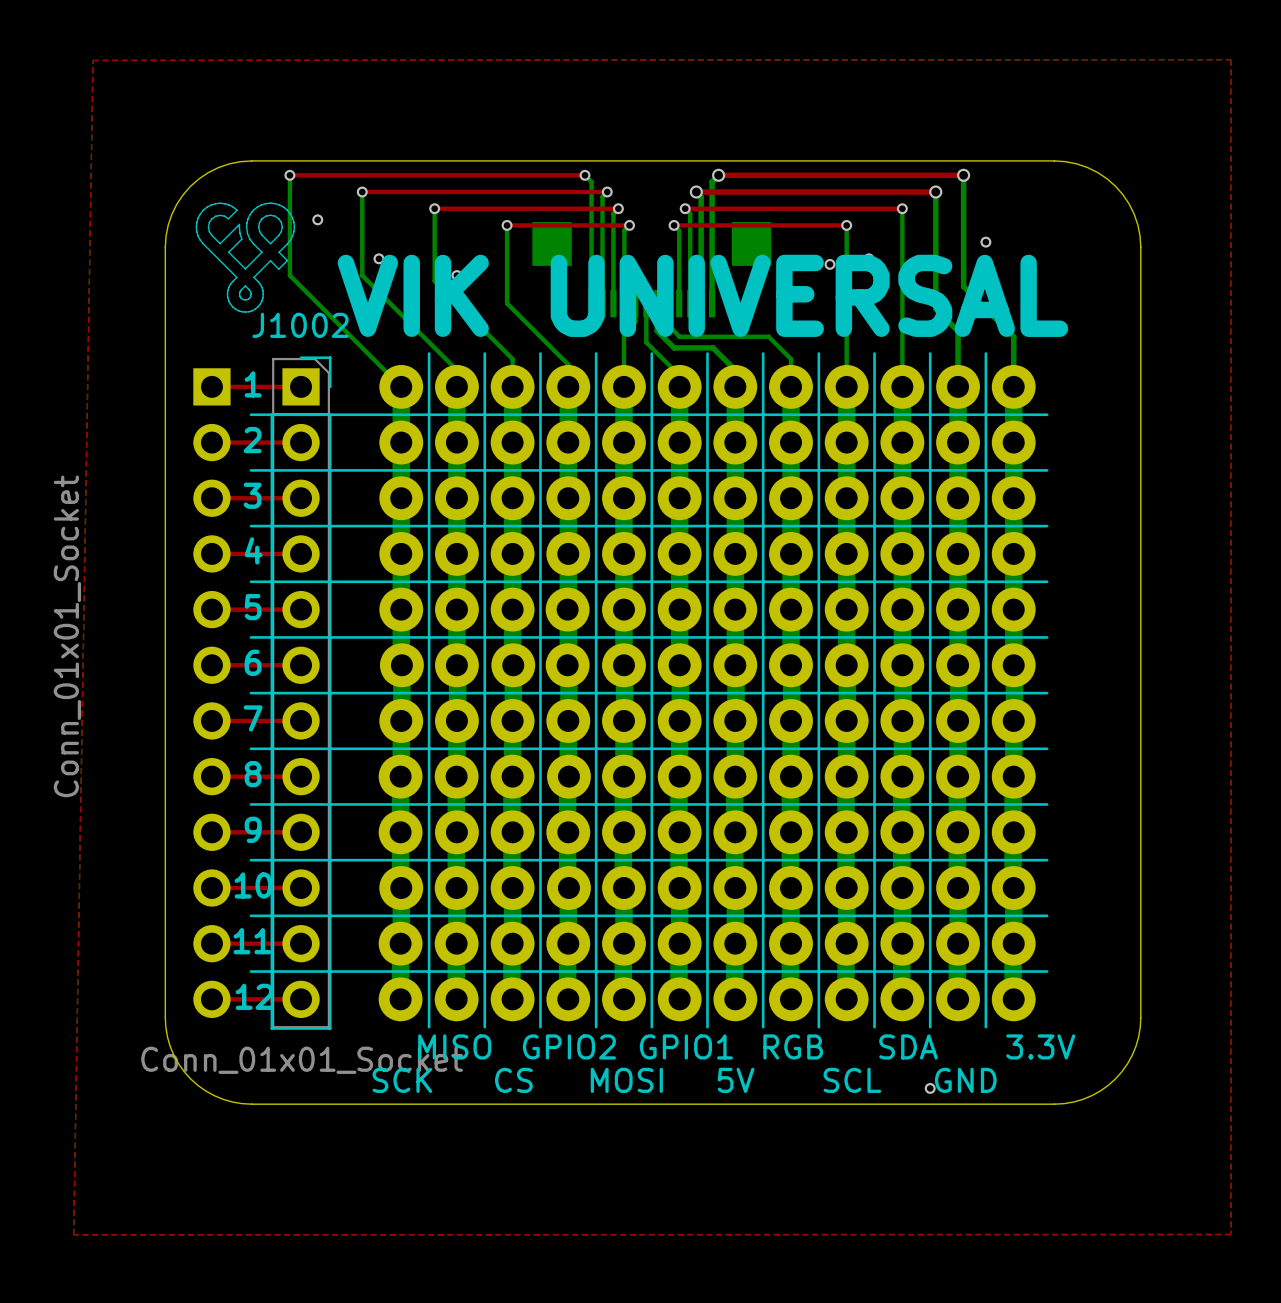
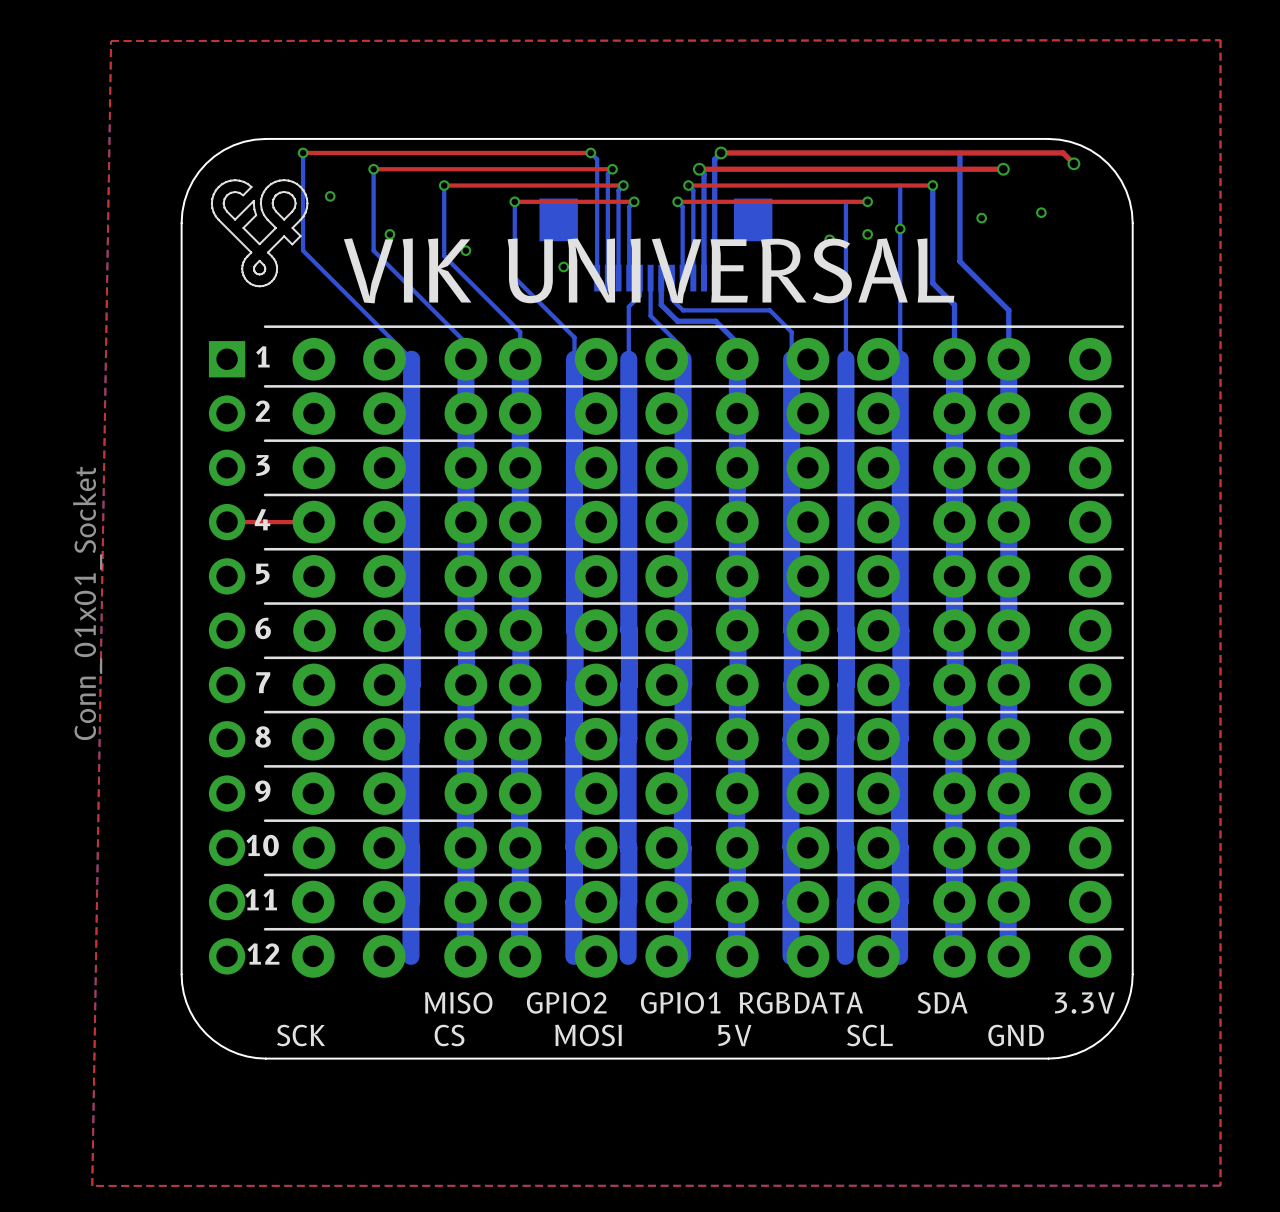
top track: none -> (959, 152) (1063, 152) (1073, 163)
via: (963, 175) -> none
via: none -> (1073, 163)
top track: none -> (932, 169) (1003, 169)
bottom track: (935, 192) (935, 208) -> none
via: (935, 192) -> none
via: none -> (1003, 169)
top track: none -> (900, 185) (932, 185)
via: (902, 208) -> none
via: none -> (932, 185)
top track: none -> (845, 201) (867, 201)
via: (846, 225) -> none
via: none -> (867, 201)
via: none -> (1041, 212)
via: none -> (900, 228)
line: none -> (265, 326) (1122, 326)
line: (429, 353) (429, 1027) -> none
line: (484, 353) (484, 1027) -> none
line: (540, 353) (540, 1027) -> none
line: (596, 353) (596, 1027) -> none
line: (651, 353) (651, 1027) -> none
line: (707, 353) (707, 1027) -> none
line: (763, 353) (763, 1027) -> none
line: (818, 353) (818, 1027) -> none
line: (874, 353) (874, 1027) -> none
line: (930, 353) (930, 1027) -> none
line: (985, 353) (985, 1027) -> none
top track: (211, 386) (301, 386) -> none
part: none -> (313, 359)
part position: (401, 386) -> (384, 359)
part: (568, 386) -> none
part: none -> (596, 359)
part: (623, 386) -> none
part position: (679, 386) -> (666, 359)
part position: (791, 386) -> (807, 359)
part: (846, 386) -> none
part: none -> (878, 359)
part: (902, 386) -> none
part: none -> (1090, 359)
line: none -> (1041, 386) (1122, 386)
top track: (211, 442) (301, 442) -> none
part: none -> (313, 413)
part position: (401, 442) -> (384, 413)
part: (568, 442) -> none
part: none -> (596, 413)
part: (623, 442) -> none
part position: (679, 442) -> (666, 413)
part position: (791, 442) -> (807, 413)
part: (846, 442) -> none
part: none -> (878, 413)
part: (902, 442) -> none
part: none -> (1090, 413)
line: none -> (1041, 440) (1122, 440)
top track: (211, 498) (301, 498) -> none
part: none -> (313, 467)
part position: (401, 498) -> (384, 467)
part: (568, 498) -> none
part: none -> (596, 467)
part: (623, 498) -> none
part position: (679, 498) -> (666, 467)
part position: (791, 498) -> (807, 467)
part: (846, 498) -> none
part: none -> (878, 467)
part: (902, 498) -> none
part: none -> (1090, 467)
line: none -> (1041, 494) (1122, 494)
part: none -> (313, 522)
part position: (401, 553) -> (384, 522)
part: (568, 553) -> none
part: none -> (596, 522)
part: (623, 553) -> none
part position: (679, 553) -> (666, 522)
part position: (791, 553) -> (807, 522)
part: (846, 553) -> none
part: none -> (878, 522)
part: (902, 553) -> none
part: none -> (1090, 522)
line: none -> (1041, 549) (1122, 549)
top track: (211, 609) (301, 609) -> none
part: none -> (313, 576)
part position: (401, 609) -> (384, 576)
part: (567, 609) -> none
part: none -> (596, 576)
part: (623, 609) -> none
part position: (679, 609) -> (666, 576)
part position: (791, 609) -> (807, 576)
part: (846, 609) -> none
part: none -> (878, 576)
part: (902, 609) -> none
part: none -> (1090, 576)
line: none -> (1041, 603) (1122, 603)
top track: (211, 665) (301, 665) -> none
part: none -> (314, 630)
part position: (401, 665) -> (384, 630)
part: (567, 665) -> none
part: none -> (596, 630)
part: (623, 665) -> none
part position: (679, 665) -> (666, 630)
part position: (791, 665) -> (807, 630)
part: (846, 665) -> none
part: none -> (878, 630)
part: (902, 665) -> none
part: none -> (1090, 630)
J1002: Conn_01x01_Socket (301, 693) -> none
line: none -> (1041, 657) (1122, 657)
top track: (211, 720) (301, 720) -> none
part: none -> (313, 684)
part position: (401, 720) -> (384, 684)
part: (568, 720) -> none
part: none -> (596, 684)
part: (623, 720) -> none
part position: (679, 720) -> (666, 684)
part position: (791, 720) -> (807, 684)
part: (846, 720) -> none
part: none -> (878, 684)
part: (902, 720) -> none
part: none -> (1090, 684)
line: none -> (1041, 712) (1122, 712)
top track: (211, 776) (301, 776) -> none
part: none -> (313, 739)
part position: (400, 776) -> (384, 739)
part: (568, 776) -> none
part: none -> (596, 739)
part: (623, 776) -> none
part position: (679, 776) -> (666, 739)
part position: (791, 776) -> (807, 739)
part: (846, 776) -> none
part: none -> (878, 739)
part: (902, 776) -> none
part: none -> (1090, 739)
line: none -> (1041, 766) (1122, 766)
top track: (211, 832) (301, 832) -> none
part: none -> (313, 793)
part position: (400, 832) -> (384, 793)
part: (568, 832) -> none
part: none -> (596, 793)
part: (623, 832) -> none
part position: (679, 832) -> (666, 793)
part position: (791, 832) -> (807, 793)
part: (846, 832) -> none
part: none -> (878, 793)
part: (902, 832) -> none
part: none -> (1090, 793)
line: none -> (1041, 820) (1122, 820)
top track: (211, 888) (301, 888) -> none
part: none -> (313, 847)
part position: (401, 888) -> (384, 847)
part: (568, 888) -> none
part: none -> (596, 847)
part: (623, 888) -> none
part position: (679, 888) -> (666, 847)
part position: (791, 888) -> (807, 847)
part: (846, 888) -> none
part: none -> (878, 847)
part: (902, 888) -> none
part: none -> (1090, 847)
line: none -> (1041, 874) (1122, 874)
top track: (211, 943) (301, 943) -> none
part: none -> (313, 902)
part position: (400, 943) -> (384, 902)
part: (568, 943) -> none
part: none -> (596, 902)
part: (623, 943) -> none
part position: (679, 943) -> (666, 902)
part position: (791, 943) -> (807, 902)
part: (846, 943) -> none
part: none -> (878, 902)
part: (902, 943) -> none
part: none -> (1090, 902)
line: none -> (1041, 929) (1122, 929)
top track: (211, 999) (301, 999) -> none
part: none -> (313, 956)
part position: (400, 999) -> (384, 956)
part: (568, 999) -> none
part: none -> (596, 956)
part: (623, 999) -> none
part position: (679, 999) -> (666, 956)
part position: (791, 999) -> (807, 956)
part: (846, 999) -> none
part: none -> (878, 956)
part: (902, 999) -> none
part: none -> (1090, 956)
text: RGB (793, 1046) -> none
text: none -> RGBDATA (801, 1002)
text position: SDA (908, 1046) -> SDA (942, 1002)
text position: 3.3V (1040, 1046) -> 3.3V (1084, 1002)
text position: SCK (402, 1080) -> SCK (301, 1035)
text position: CS (513, 1080) -> CS (449, 1035)
text position: MOSI (626, 1080) -> MOSI (588, 1035)
text position: SCL (852, 1080) -> SCL (869, 1035)
text position: GND (965, 1080) -> GND (1016, 1035)
via: (930, 1088) -> none

